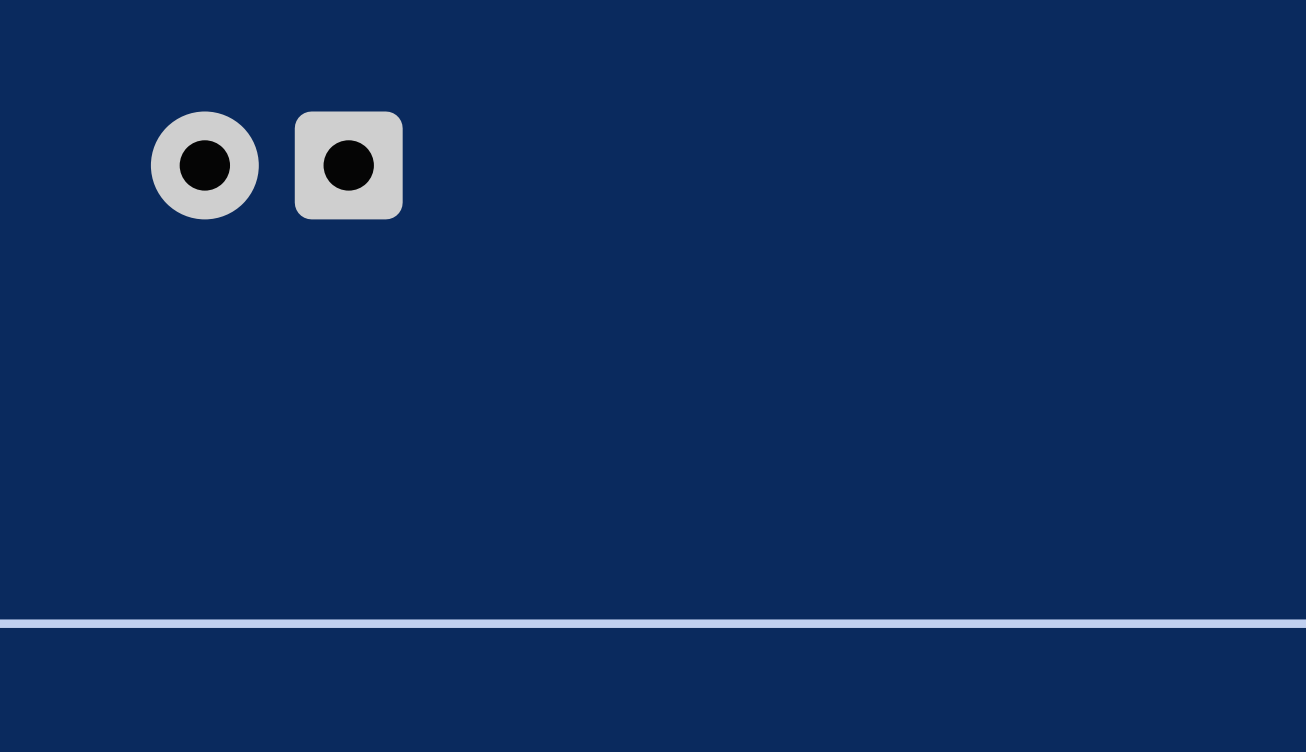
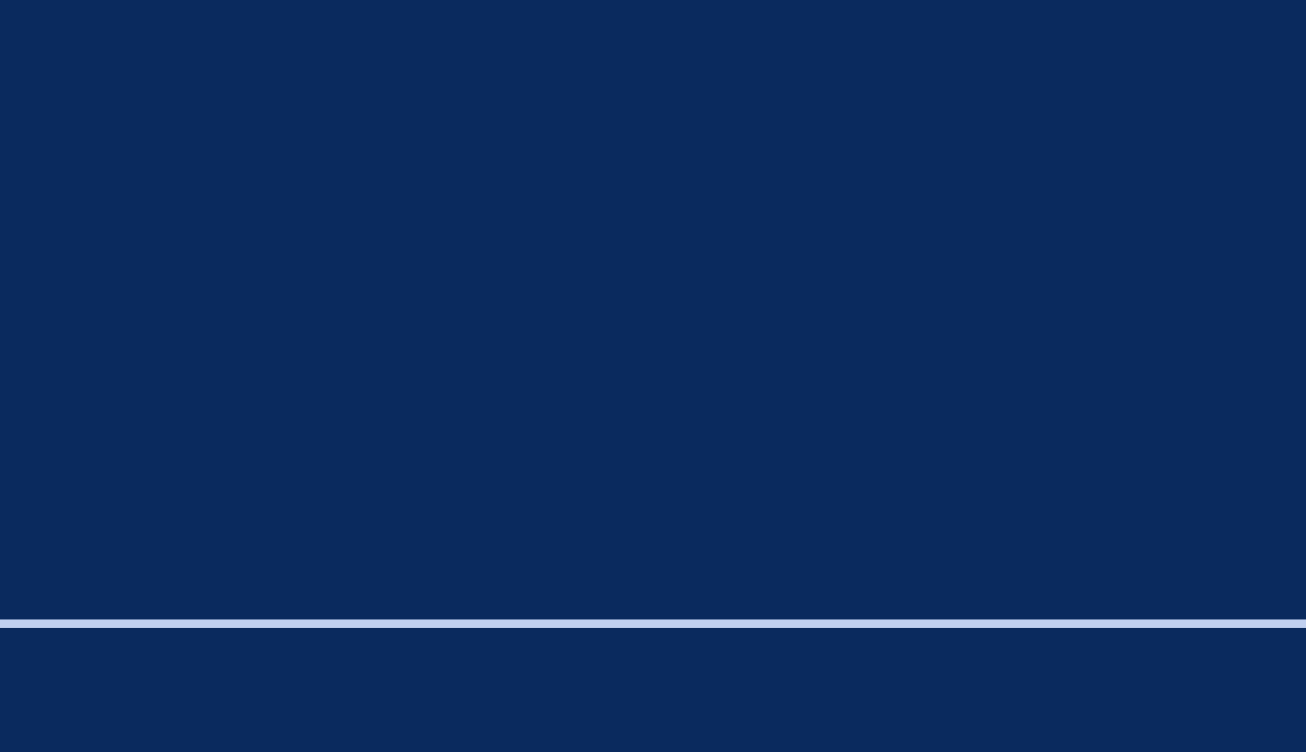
part: (276, 165) -> none

